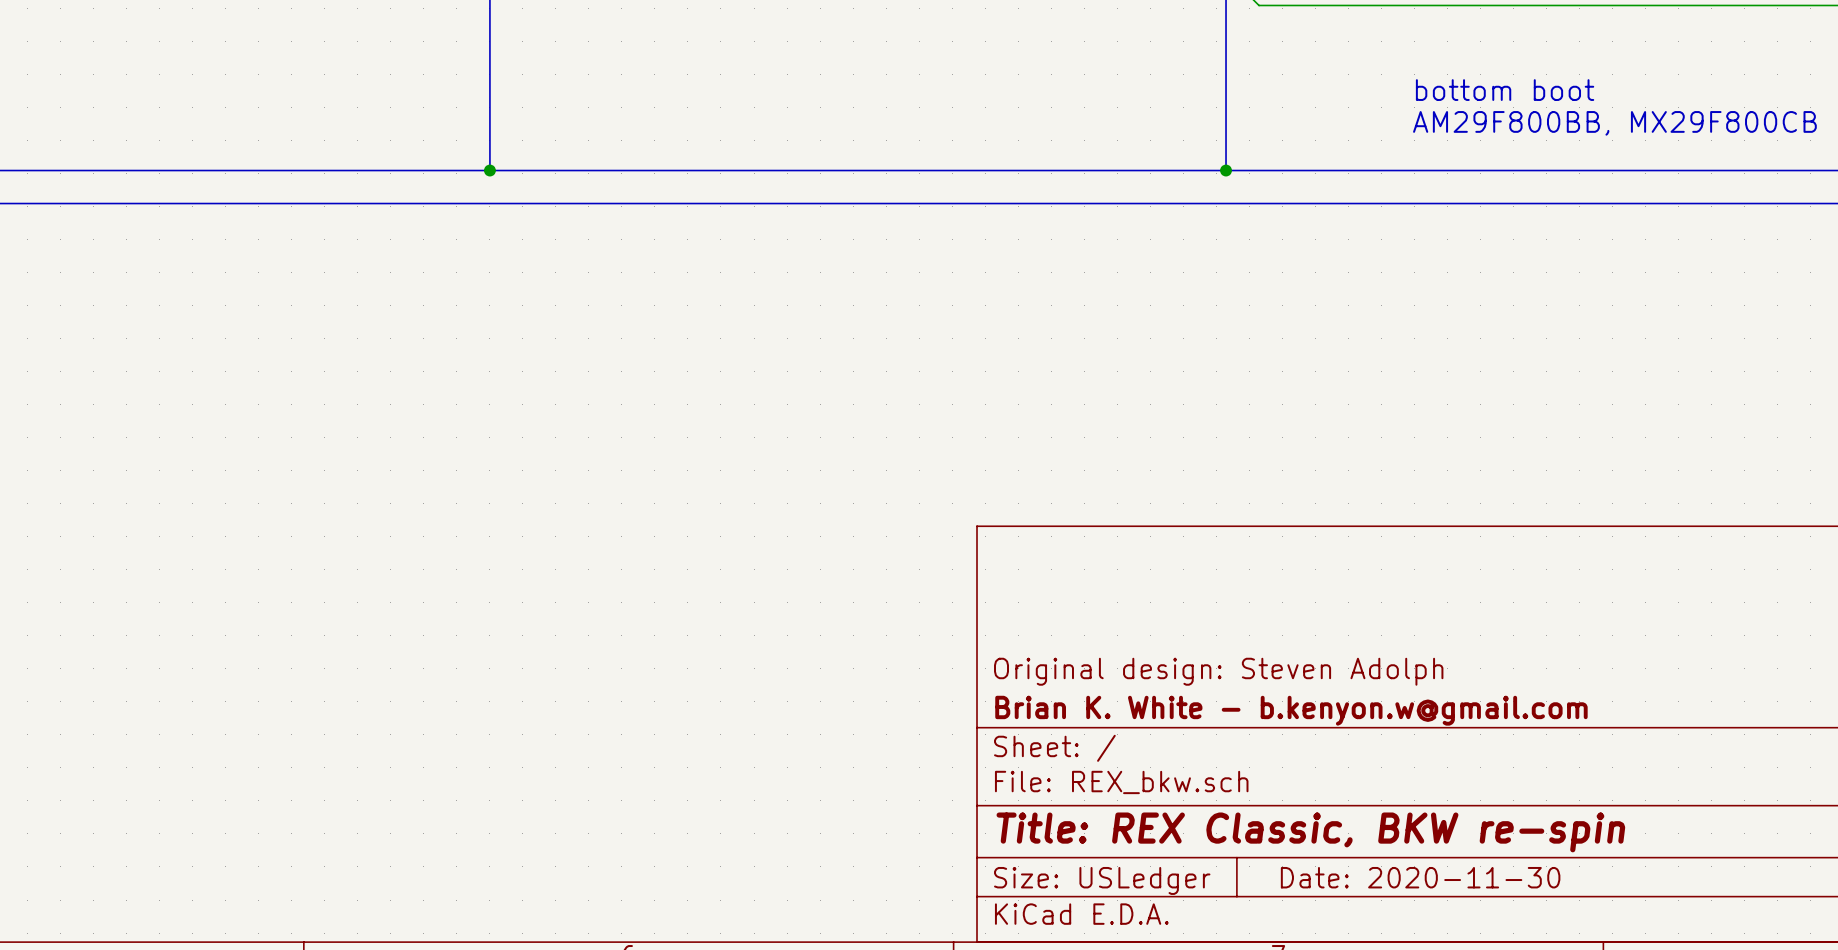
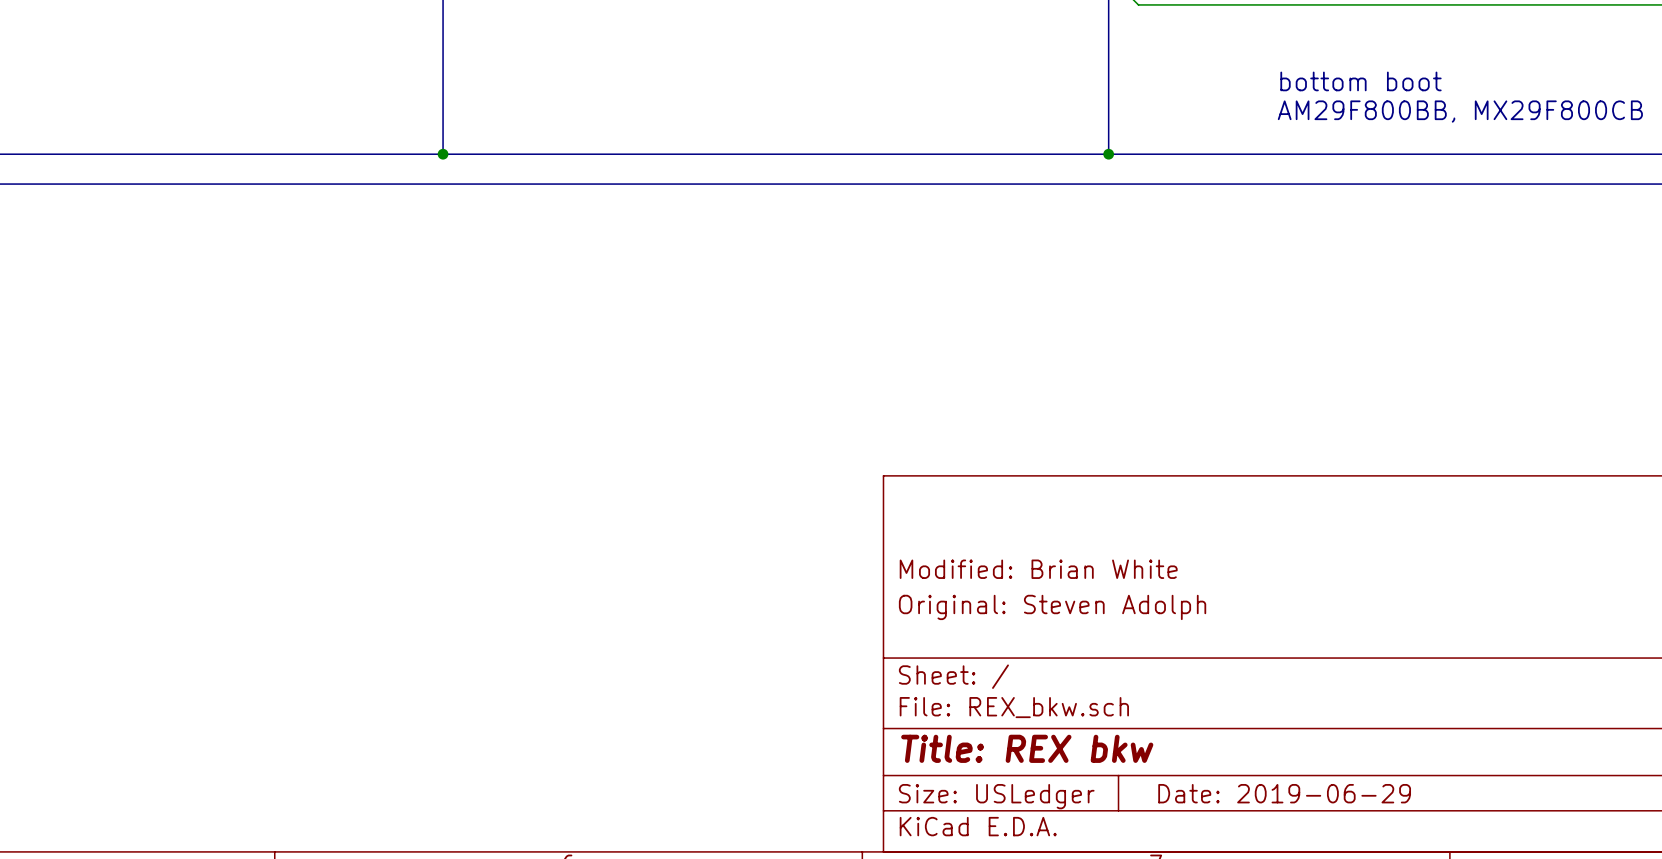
title block: none -> Modified: Brian White (1038, 569)
title block: Original design: Steven Adolph (1218, 671) -> Original: Steven Adolph (1052, 607)
title block: Brian K. White - b.kenyon.w@gmail.com (1291, 710) -> none
title block: Title: REX Classic, BKW re-spin (1310, 832) -> Title: REX bkw (1027, 748)
title block: Date: 2020-11-30 (1420, 877) -> Date: 2019-06-29 (1284, 793)

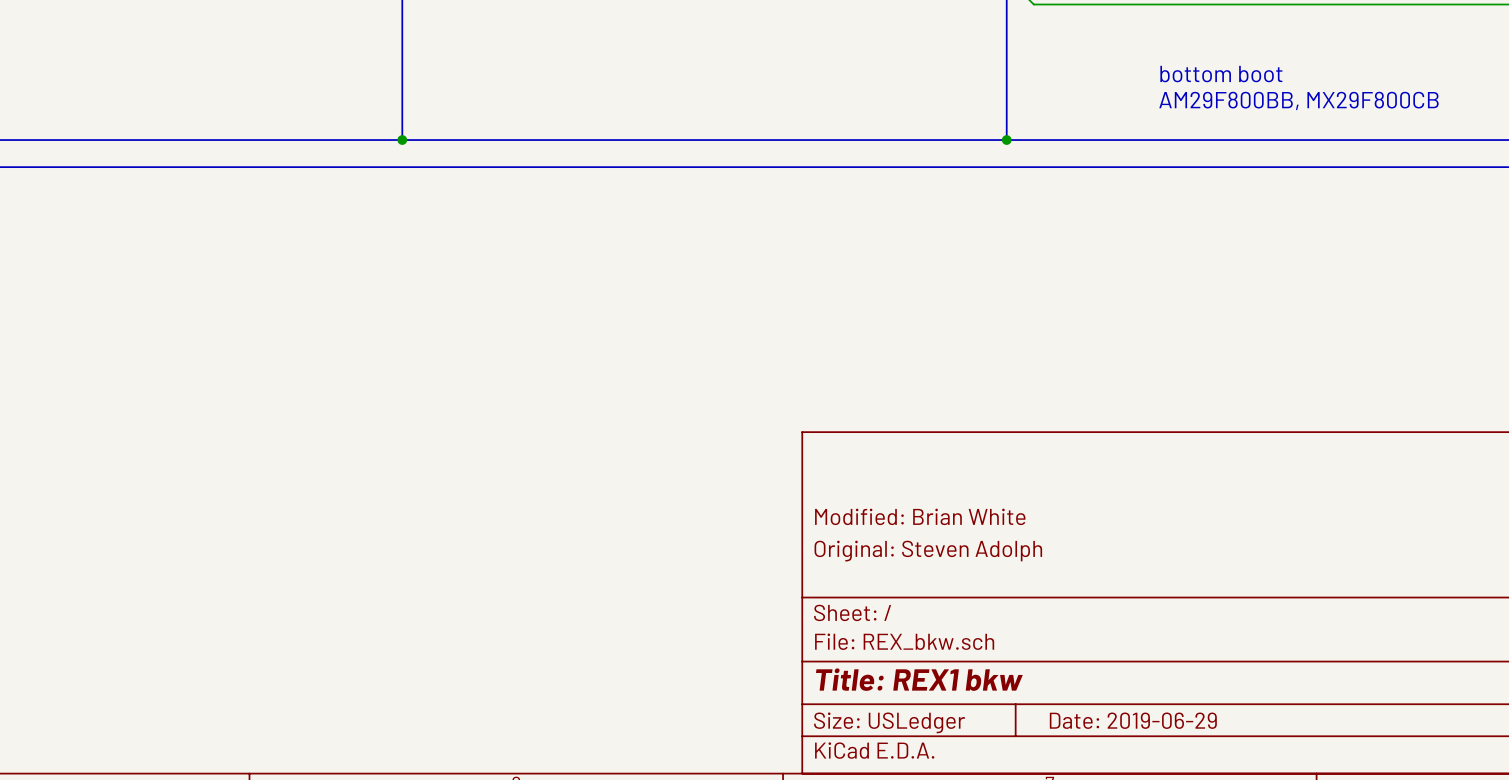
title block: Title: REX bkw (1027, 748) -> Title: REX1 bkw (919, 679)

